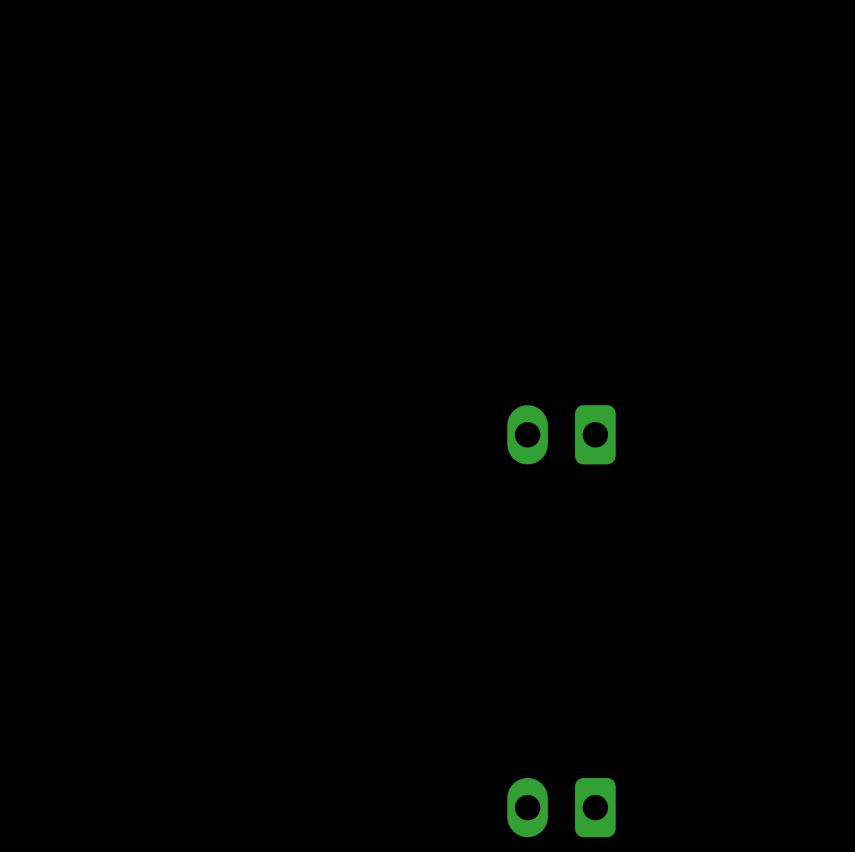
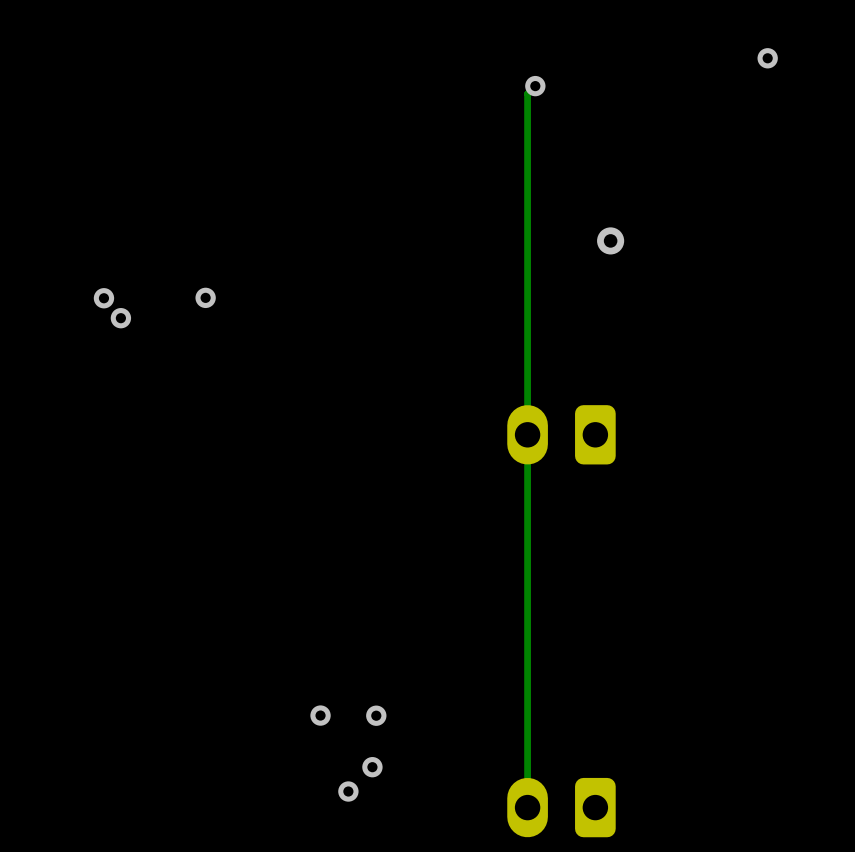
via: none -> (767, 58)
track: none -> (535, 86) (527, 93) (527, 807)
via: none -> (535, 86)
via: none -> (610, 240)
via: none -> (205, 297)
via: none -> (103, 298)
via: none -> (120, 318)
via: none -> (320, 715)
via: none -> (376, 715)
via: none -> (372, 767)
via: none -> (348, 791)

